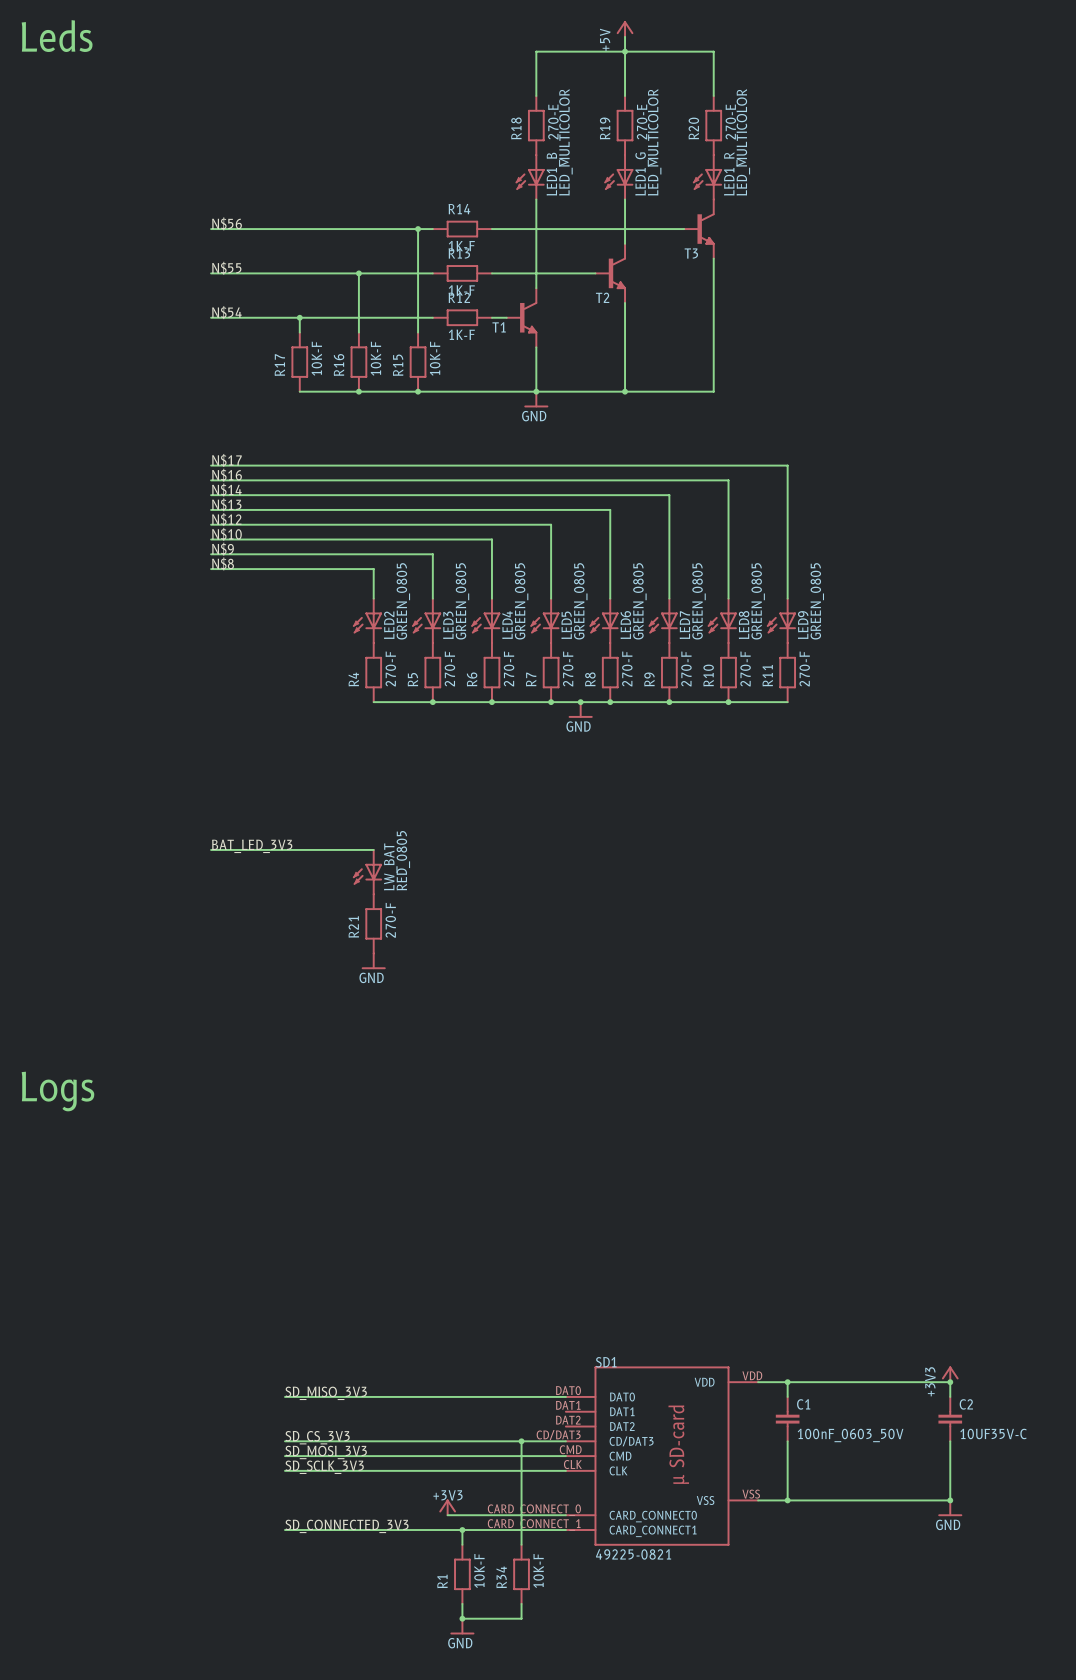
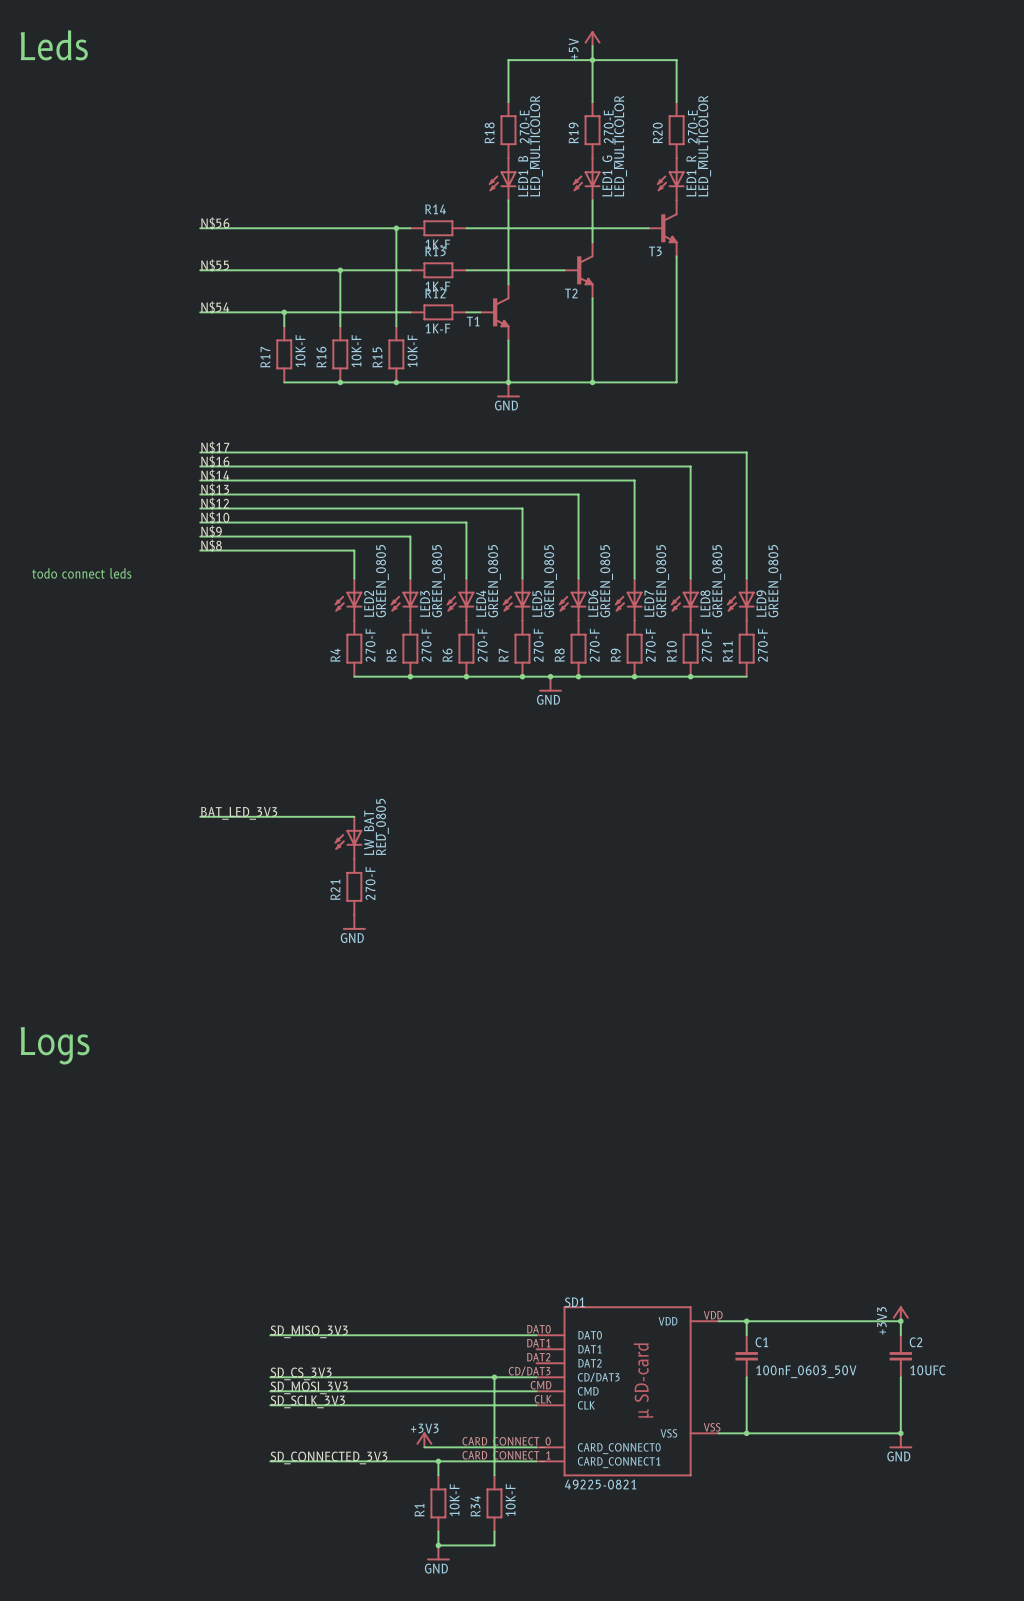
text: none -> todo connect leds (81, 573)
C2 value: 10UF35V-C (993, 1433) -> 10UFC (927, 1370)

